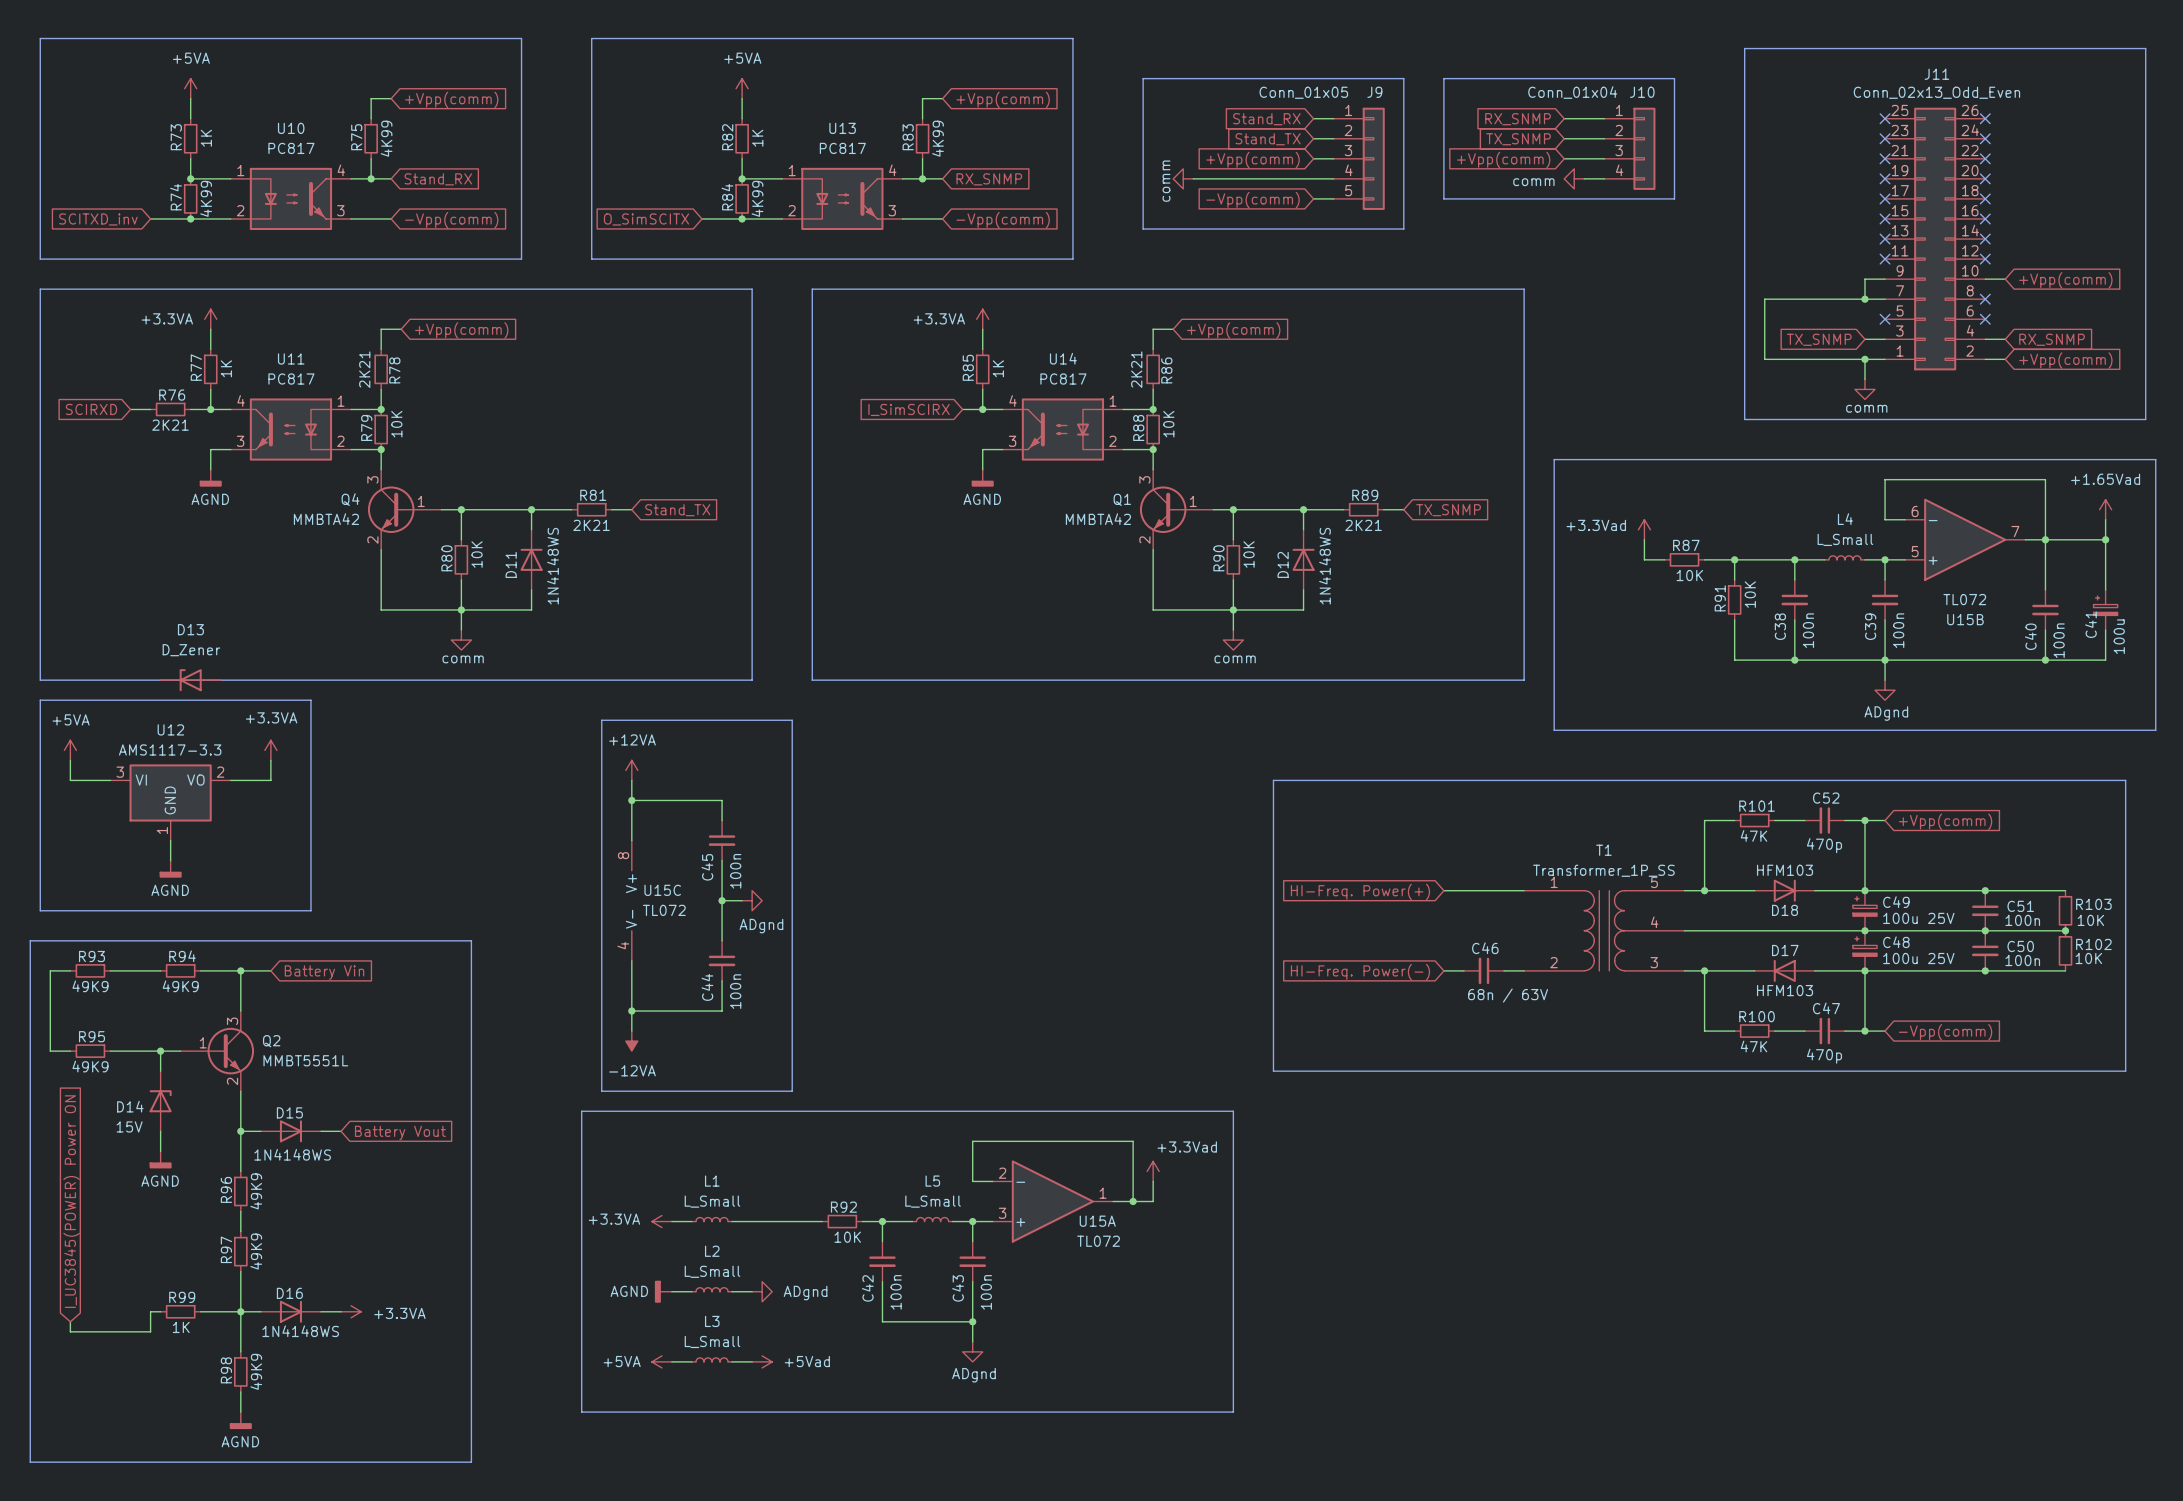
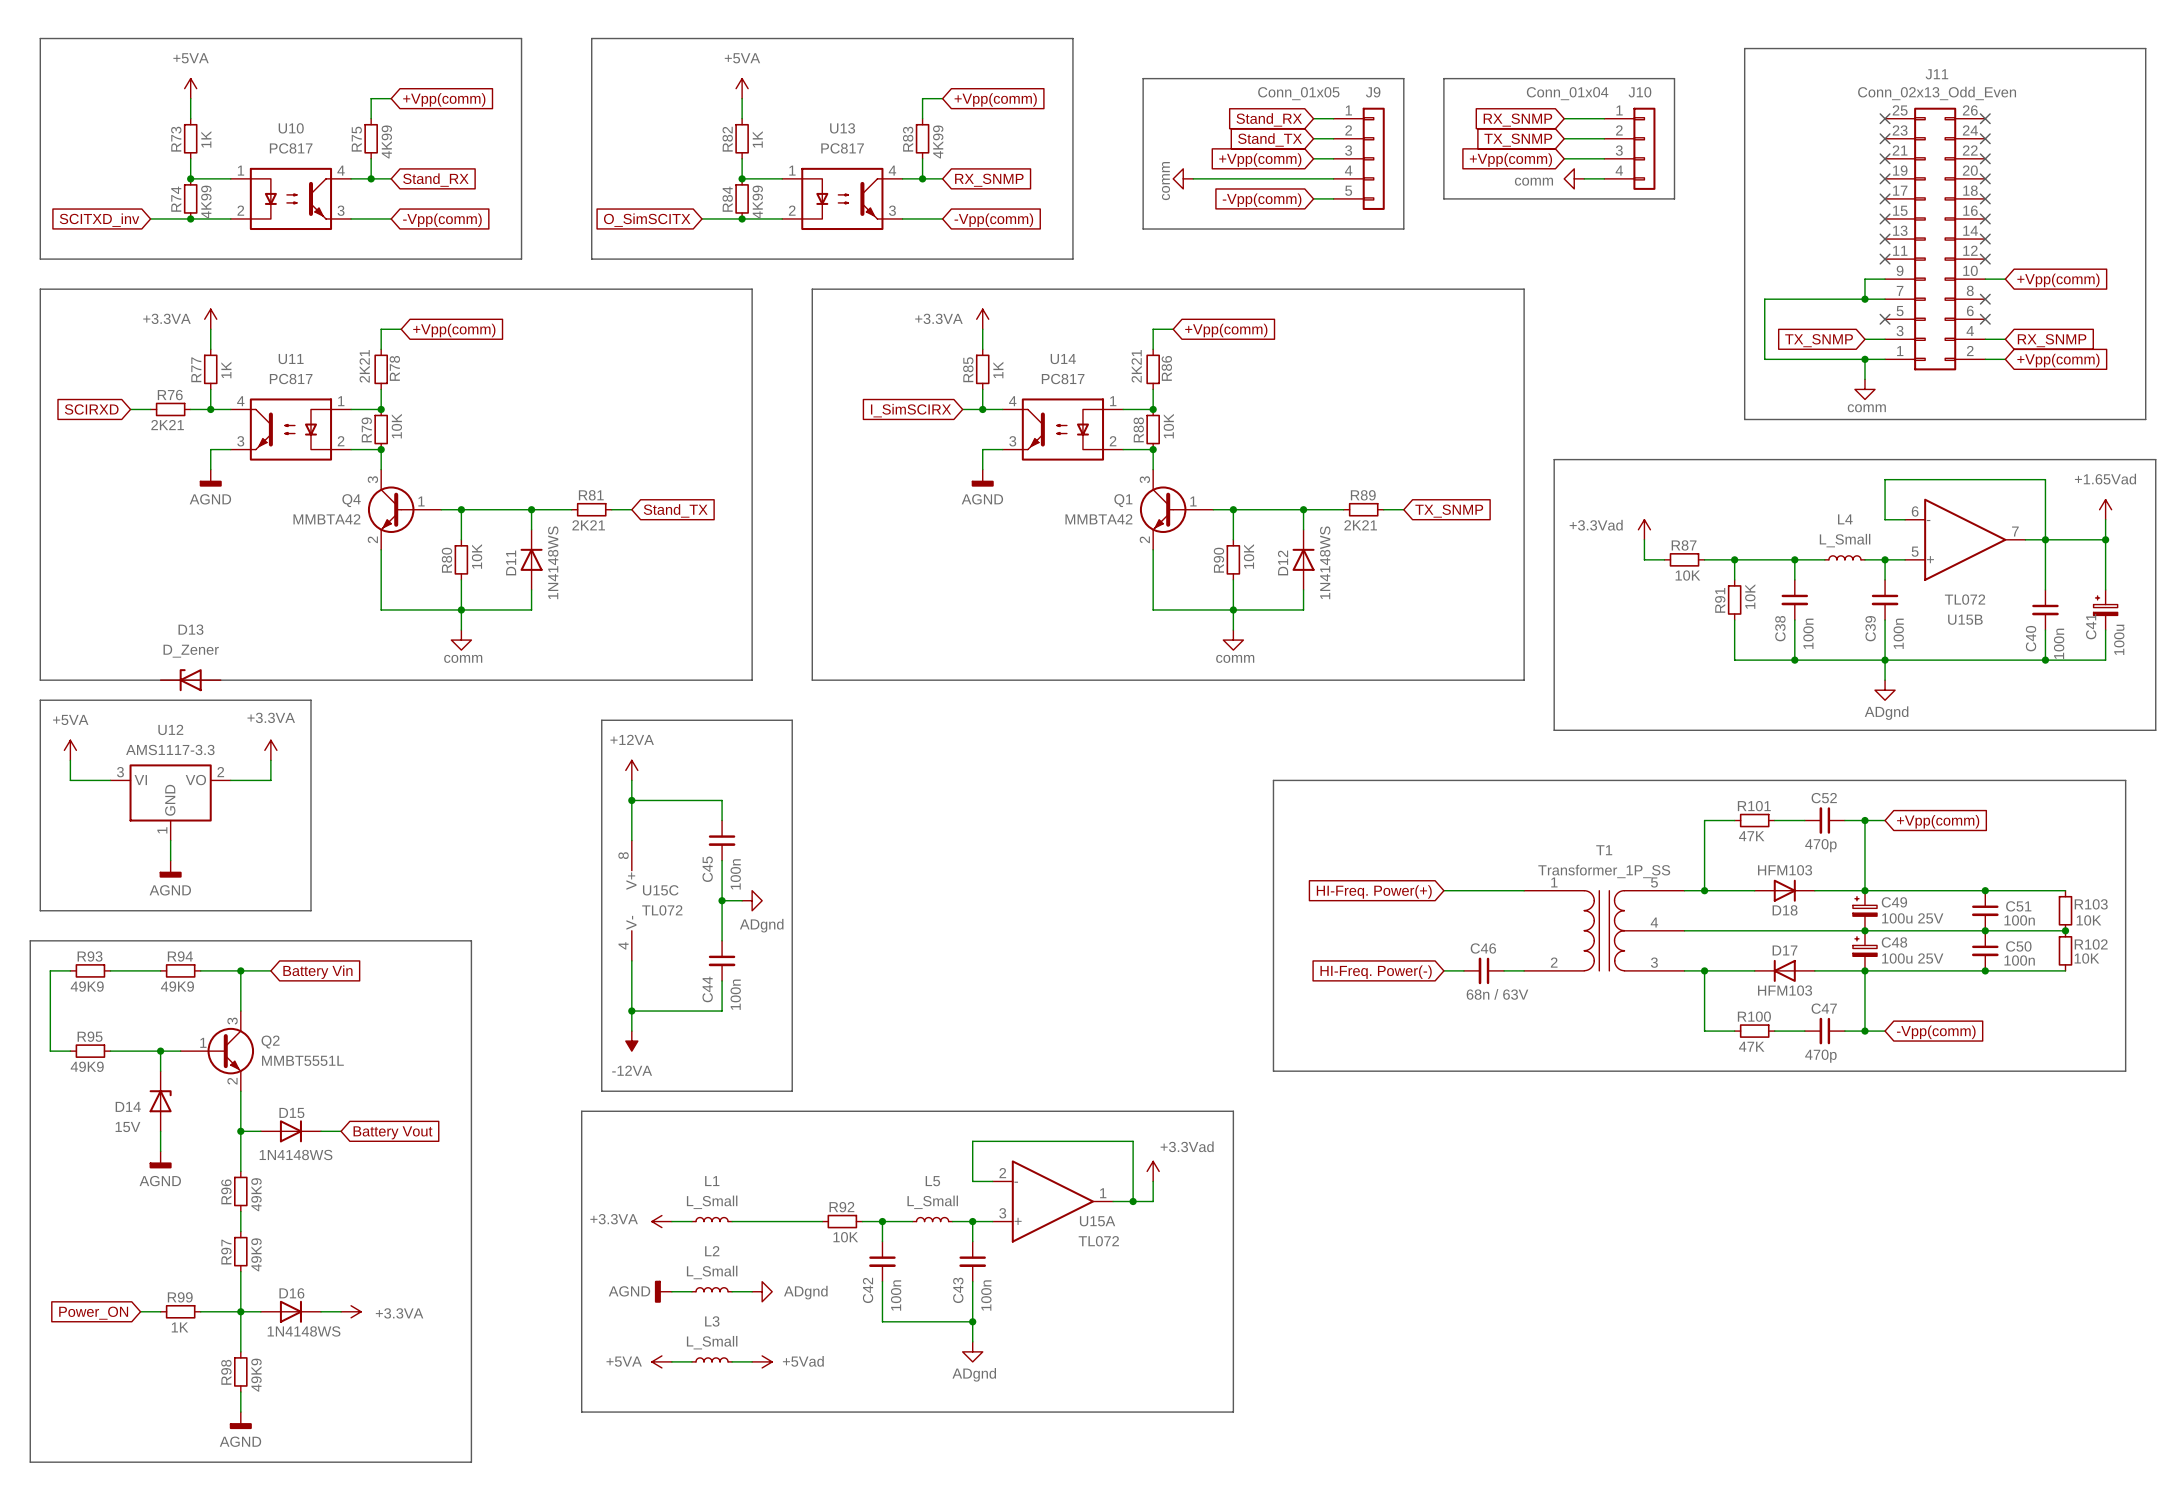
global label: I_UC3845(POWER) Power ON (71, 1201) -> none
wire: (150, 1311) (150, 1331) (70, 1331) (70, 1321) -> (150, 1311) (140, 1311)
global label: none -> Power_ON (93, 1313)

